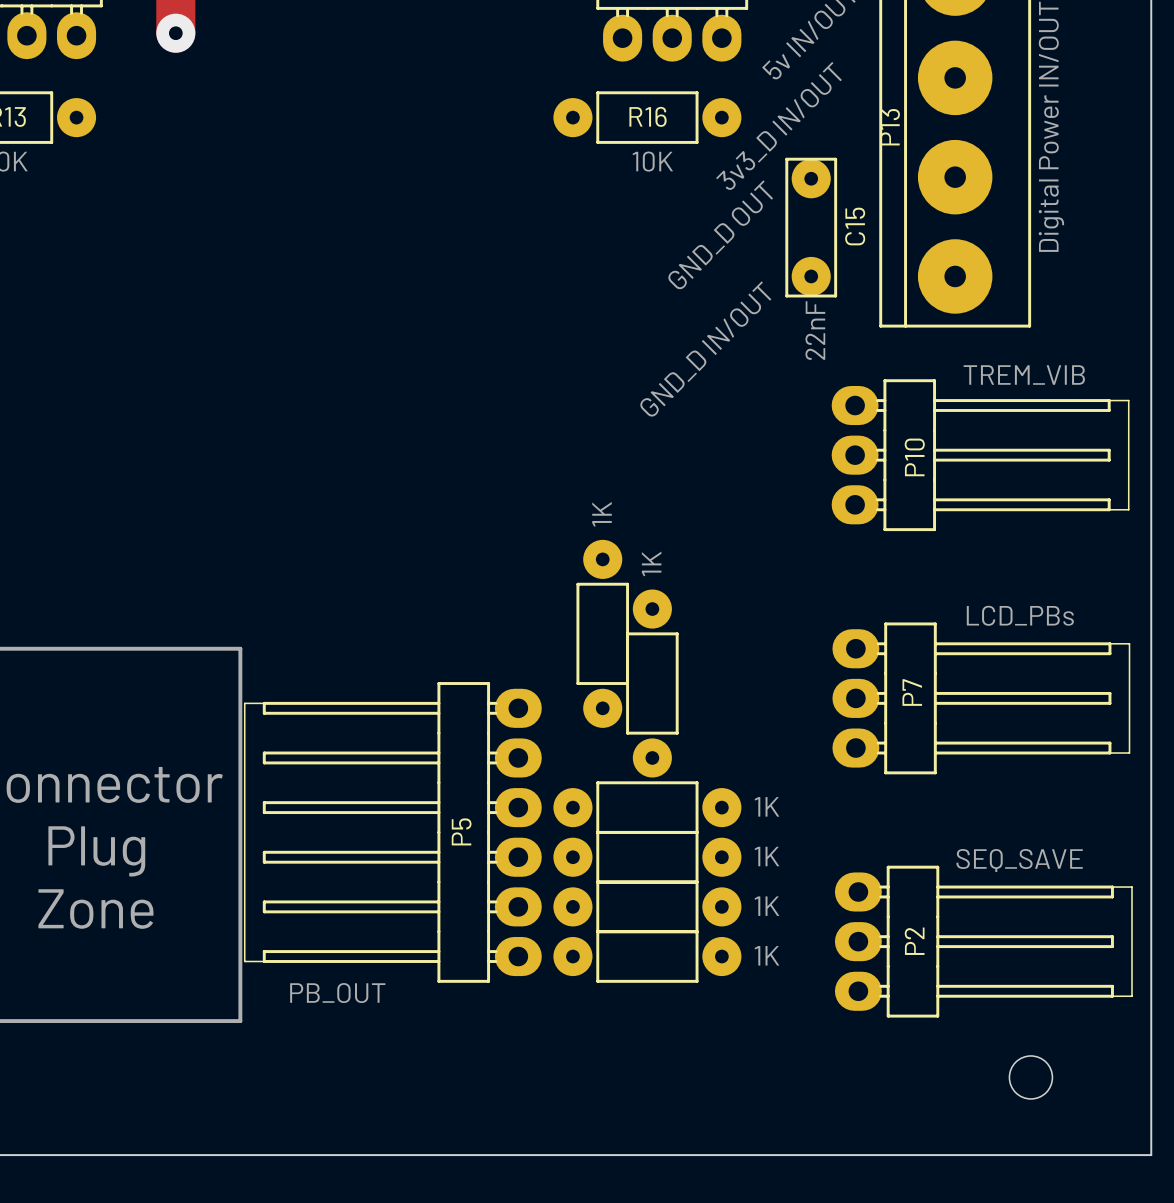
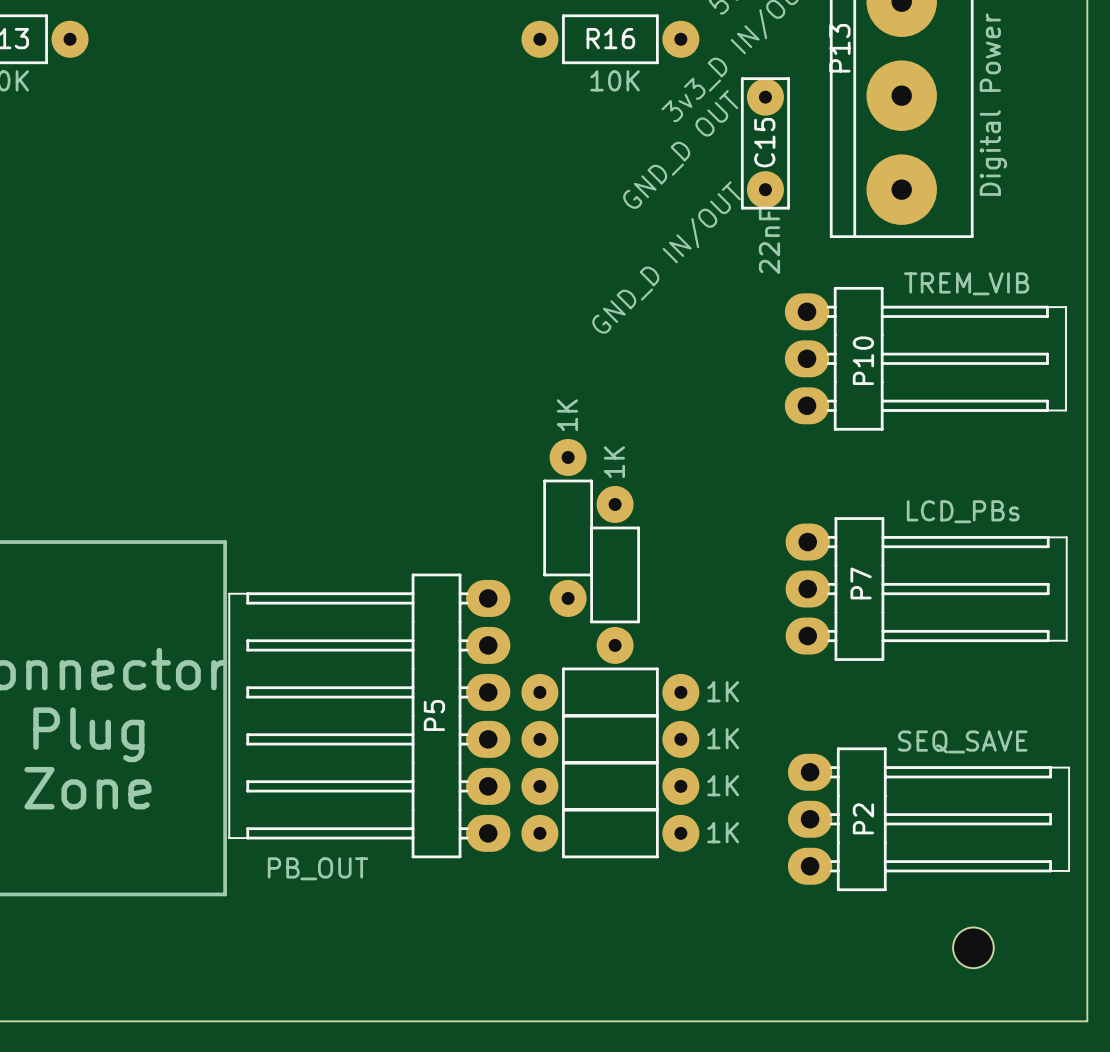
C15 name position: C15 (855, 226) -> C15 (764, 142)

